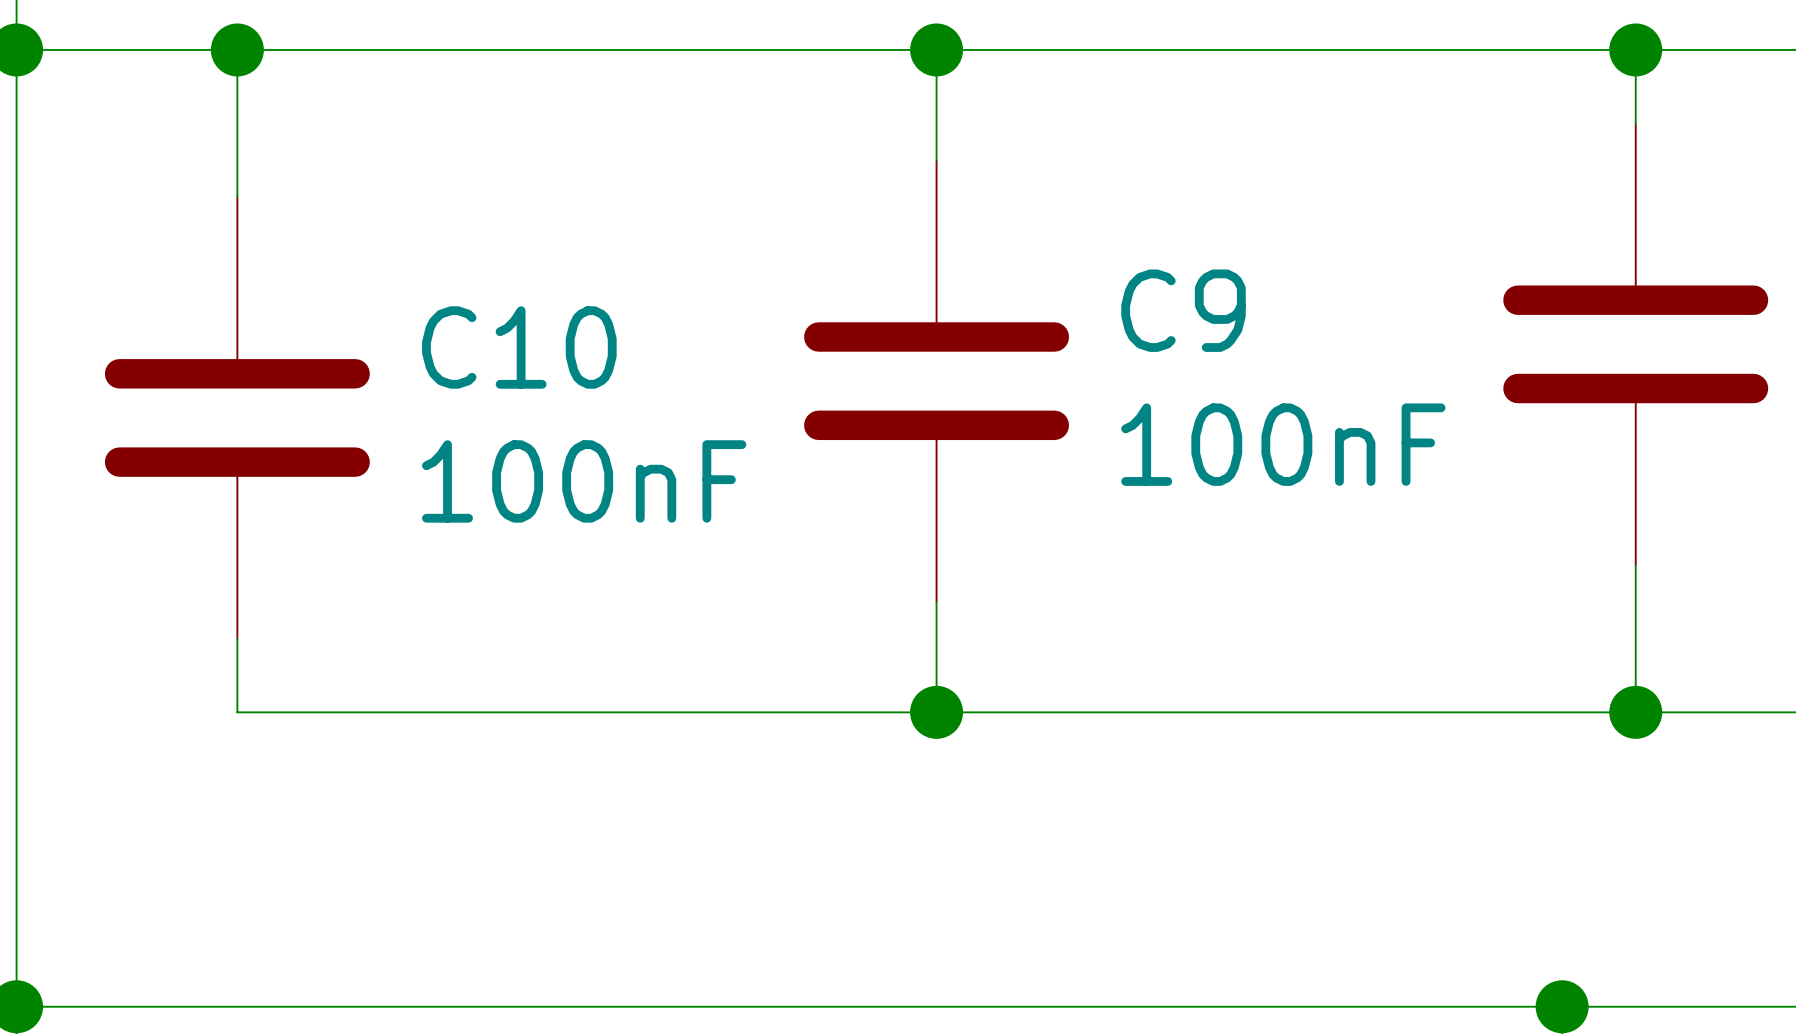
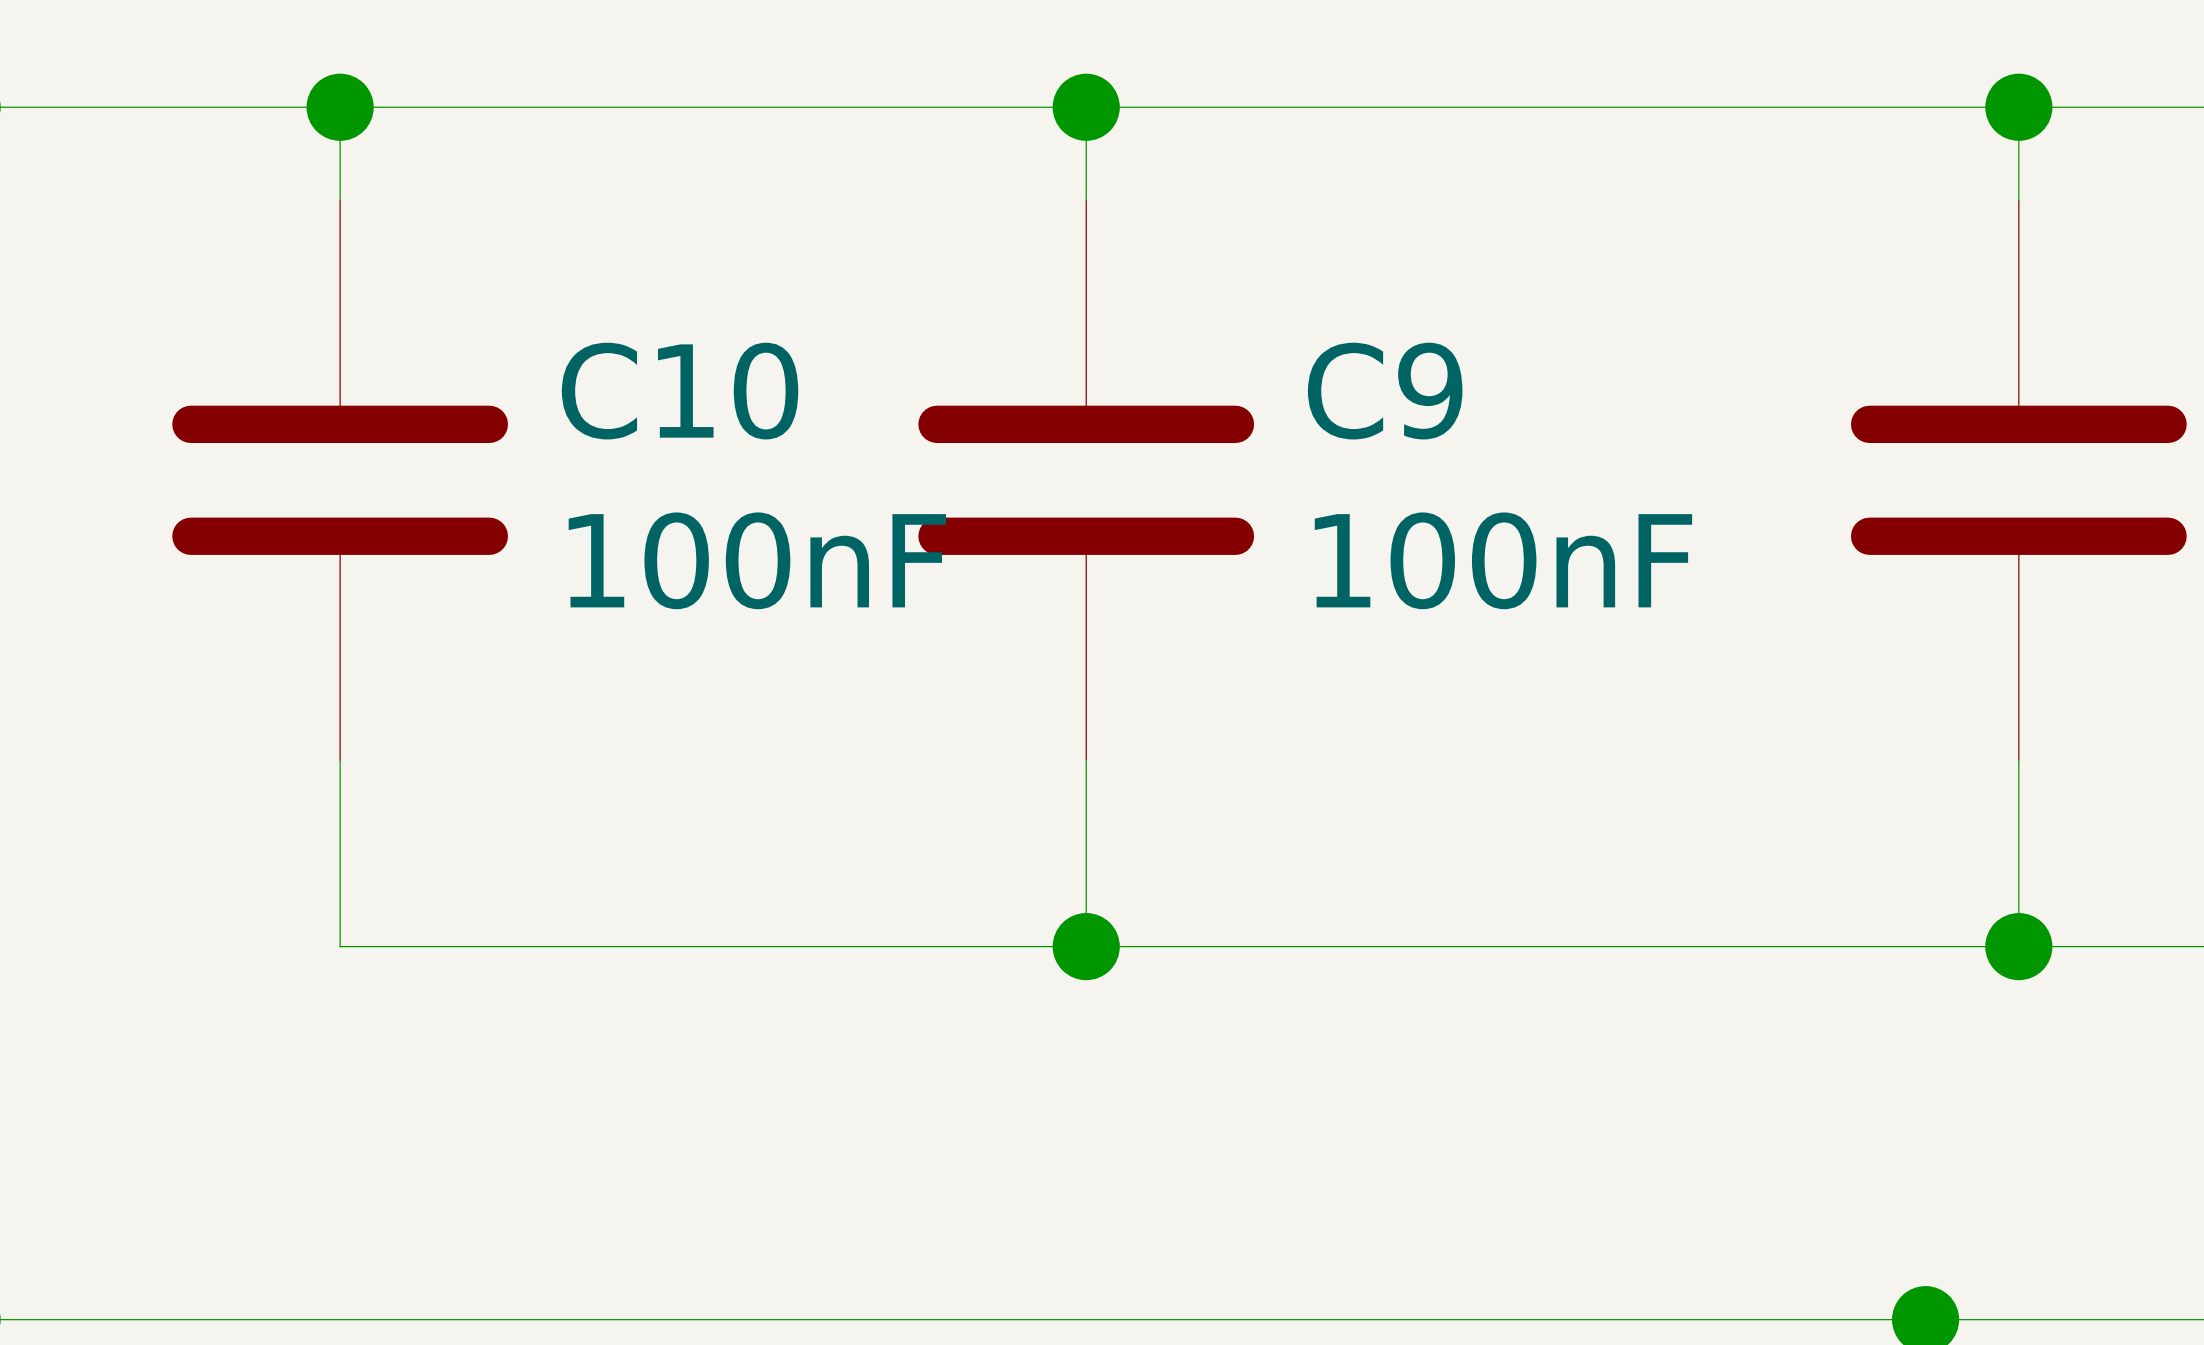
wire: (237, 49) (237, 197) -> (1086, 760) (1086, 946)
junction position: (237, 49) -> (340, 107)
wire: none -> (340, 107) (340, 200)
wire: none -> (1086, 107) (1086, 200)
wire: (936, 49) (936, 160) -> none
junction position: (936, 49) -> (1086, 107)
C9 position: (936, 381) -> (1086, 480)
C10 position: (237, 417) -> (340, 480)
wire: (936, 601) (936, 712) -> none
wire: (237, 638) (237, 712) (310, 712) -> (340, 760) (340, 946)
junction position: (936, 712) -> (1086, 946)

